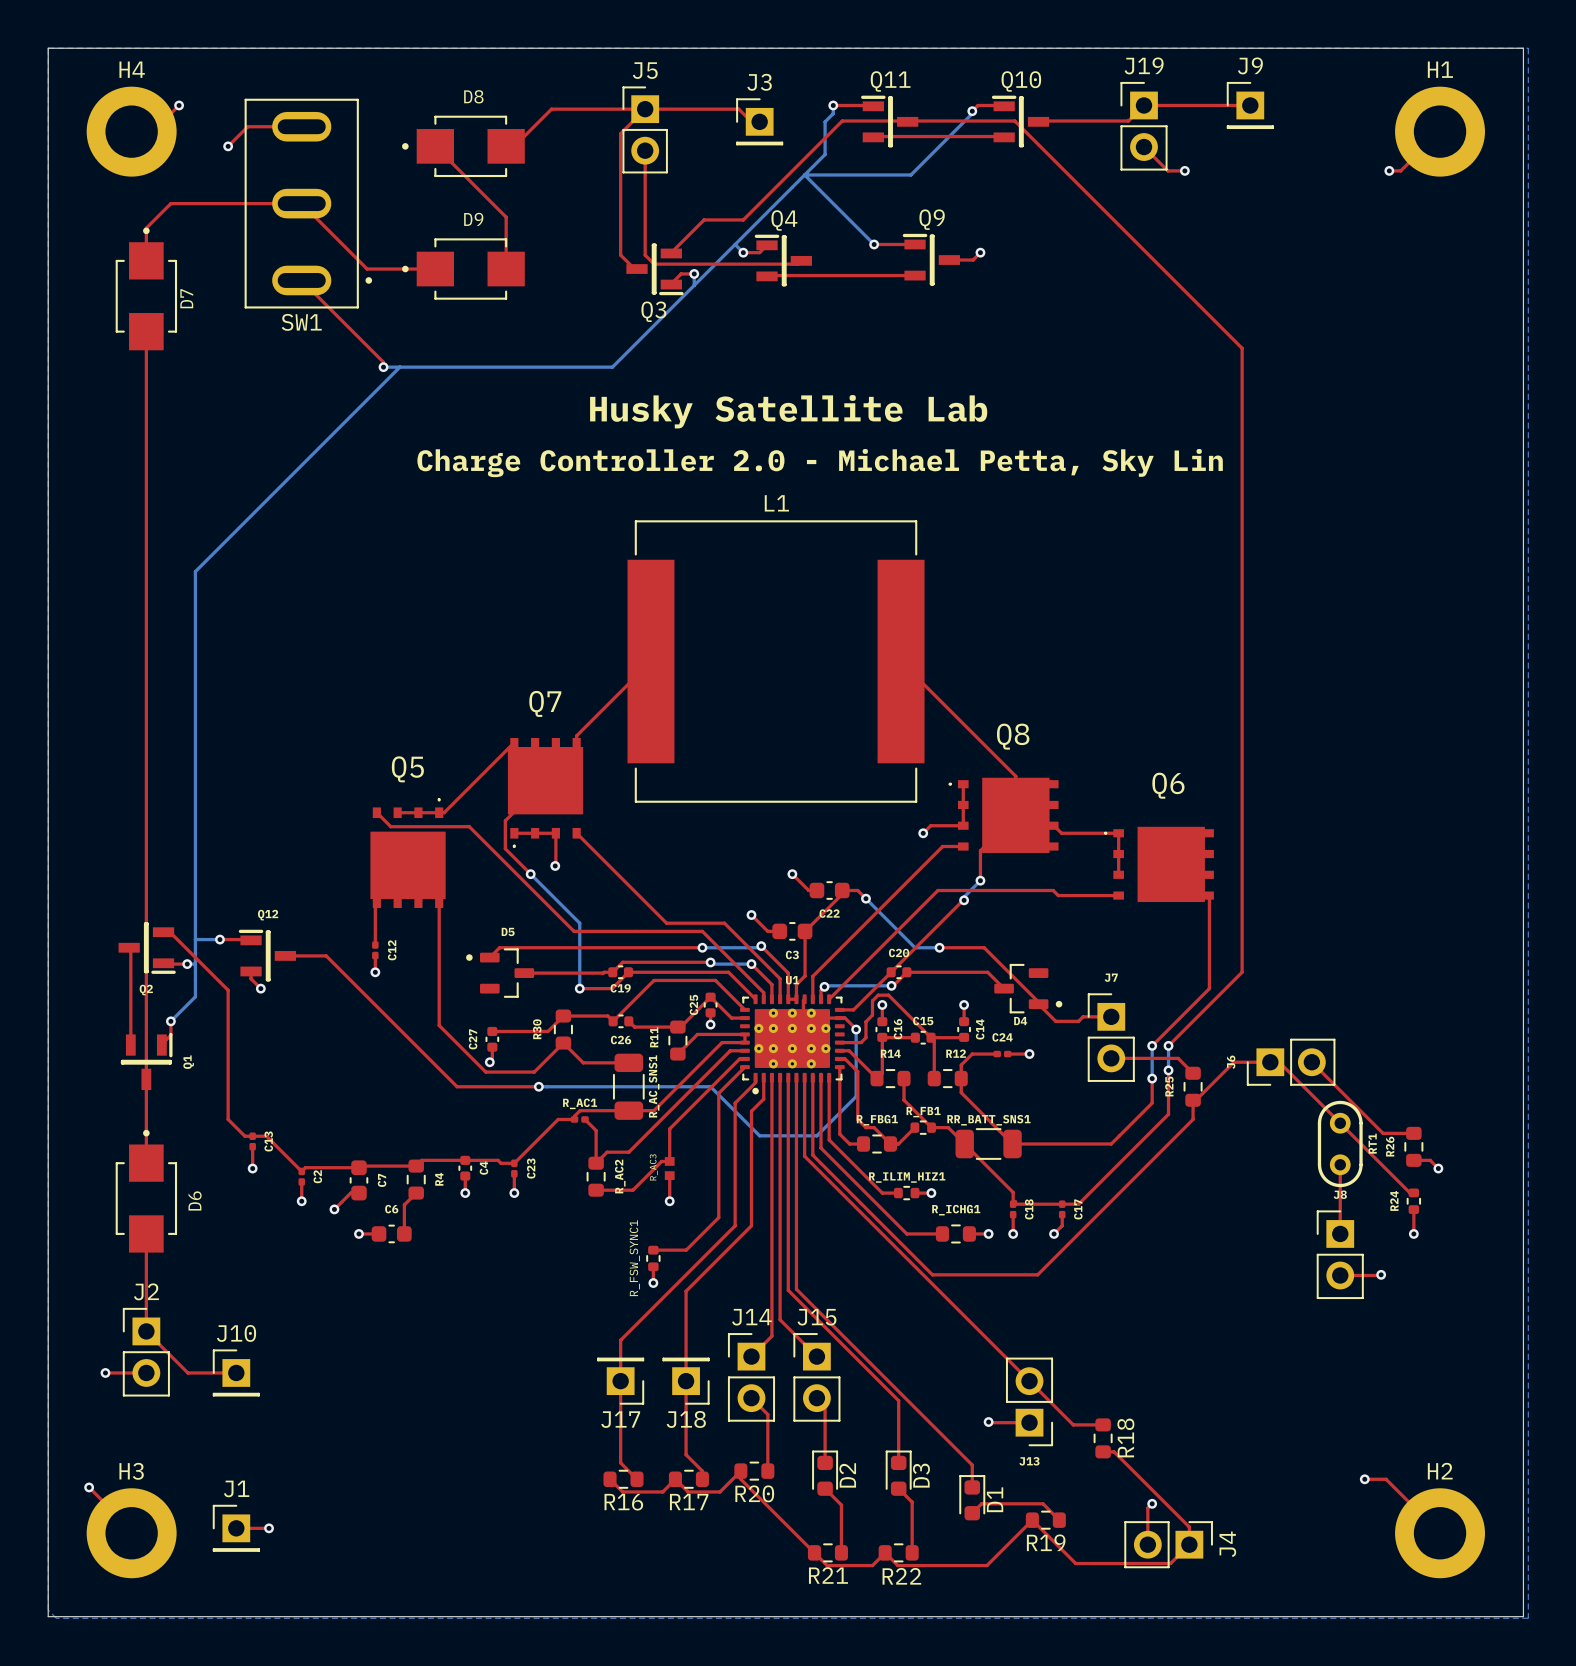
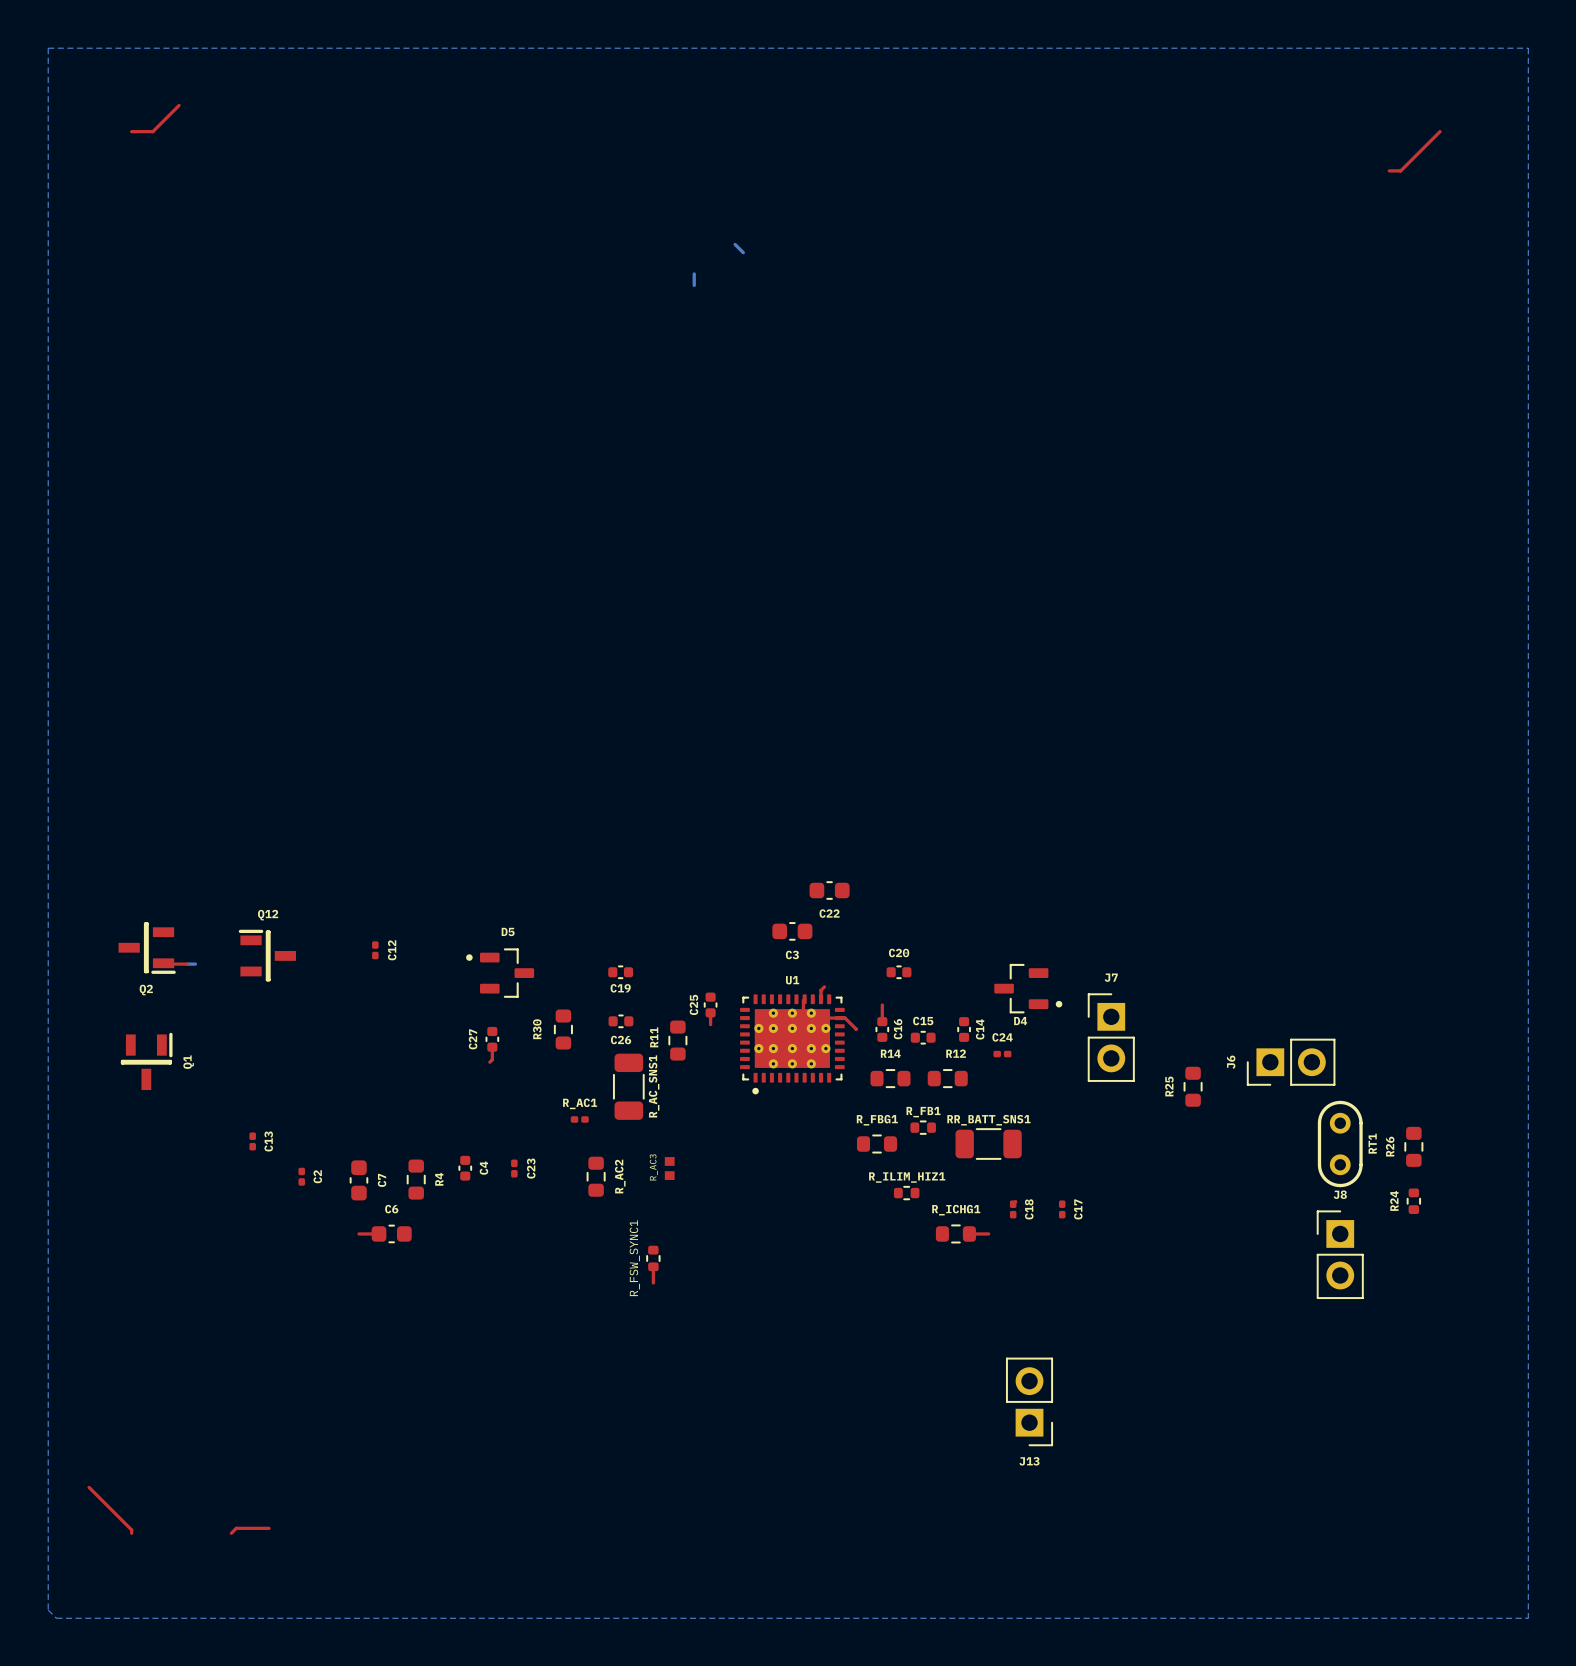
board edge: (48, 48) (48, 1616) (1523, 1616) (1523, 48) (48, 48) -> none
via: (179, 105) -> none
top track: (833, 105) (874, 105) -> none
bottom track: (833, 105) (833, 113) (825, 121) (825, 154) (612, 367) (383, 367) -> none
via: (833, 105) -> none
top track: (1004, 105) (978, 105) (972, 111) -> none
top track: (1250, 105) (1144, 105) (1128, 121) (1039, 121) -> none
J9: (1250, 105) -> none
top track: (645, 109) (620, 133) (620, 255) (635, 269) -> none
bottom track: (972, 111) (972, 113) (910, 174) (804, 174) (874, 244) -> none
via: (972, 111) -> none
top track: (759, 121) (751, 121) (738, 109) (551, 109) (514, 146) (506, 146) -> none
J3: (759, 121) -> none
Q11: (889, 121) -> none
Q10: (1020, 121) -> none
top track: (301, 126) (247, 126) (228, 146) -> none
J19: (1144, 126) -> none
J5: (645, 129) -> none
H4: (131, 131) -> none
H1: (1440, 131) -> none
top track: (874, 136) (1004, 136) -> none
via: (228, 146) -> none
top track: (435, 146) (506, 217) (506, 269) -> none
D8: (463, 146) -> none
top track: (1144, 147) (1167, 170) (1184, 170) -> none
top track: (645, 150) (645, 255) (654, 264) (798, 264) (802, 260) -> none
via: (1184, 170) -> none
via: (1389, 170) -> none
SW1: (308, 203) -> none
top track: (767, 244) (759, 252) (743, 252) -> none
top track: (874, 244) (906, 244) -> none
via: (874, 244) -> none
via: (743, 252) -> none
top track: (980, 252) (973, 260) (941, 260) -> none
via: (980, 252) -> none
top track: (669, 254) (704, 219) (743, 219) (842, 121) (1014, 121) (1242, 348) (1242, 972) (1168, 1045) -> none
Q9: (931, 259) -> none
top track: (146, 260) (146, 228) (170, 203) (301, 203) (367, 269) (435, 269) -> none
Q4: (783, 260) -> none
D9: (463, 269) -> none
Q3: (654, 269) -> none
top track: (694, 273) (681, 273) (669, 285) -> none
via: (694, 273) -> none
top track: (767, 275) (906, 275) -> none
top track: (301, 280) (383, 362) (383, 367) -> none
D7: (146, 288) -> none
top track: (146, 331) (146, 1163) -> none
via: (383, 367) -> none
bottom track: (399, 367) (195, 571) (195, 996) (170, 1021) -> none
text: Husky Satellite Lab (788, 411) -> none
text: Charge Controller 2.0 - Michael Petta, Sky Lin (820, 463) -> none
top track: (650, 661) (576, 735) (576, 742) -> none
L1: (776, 661) -> none
top track: (901, 672) (901, 661) (1015, 776) (1015, 815) (980, 850) (980, 880) -> none
top track: (514, 742) (444, 812) (397, 812) -> none
top track: (545, 780) (505, 820) (505, 848) (530, 874) -> none
top track: (963, 784) (963, 825) (930, 825) (923, 833) -> none
Q7: (545, 792) -> none
top track: (376, 812) (390, 826) (469, 826) (574, 931) (702, 931) (763, 992) (763, 999) -> none
Q8: (1003, 815) -> none
top track: (1054, 825) (1061, 833) (1118, 833) (1118, 874) -> none
top track: (514, 833) (555, 833) (555, 865) -> none
top track: (576, 833) (666, 923) (724, 923) (780, 978) (780, 999) -> none
via: (923, 833) -> none
top track: (963, 846) (942, 846) (812, 976) (812, 999) -> none
Q5: (408, 853) -> none
Q6: (1158, 864) -> none
via: (555, 865) -> none
bottom track: (530, 874) (579, 923) (579, 988) -> none
via: (530, 874) -> none
top track: (792, 874) (808, 890) (816, 890) -> none
via: (792, 874) -> none
bottom track: (980, 880) (964, 897) (964, 900) -> none
via: (980, 880) -> none
top track: (1118, 895) (1058, 895) (1053, 890) (937, 890) (829, 999) -> none
top track: (1209, 895) (1209, 988) (1152, 1045) -> none
top track: (865, 898) (857, 890) (842, 890) (842, 894) (805, 931) (805, 975) (796, 984) (796, 999) (788, 999) (788, 973) (761, 946) -> none
bottom track: (865, 898) (915, 947) (939, 947) -> none
via: (865, 898) -> none
top track: (964, 900) (853, 1009) (839, 1009) -> none
via: (964, 900) -> none
top track: (376, 903) (375, 945) -> none
top track: (439, 903) (439, 1025) (485, 1072) (534, 1072) (563, 1043) -> none
top track: (751, 915) (767, 931) (779, 931) -> none
via: (751, 915) -> none
top track: (164, 932) (170, 932) (228, 990) (228, 1119) (244, 1136) (266, 1136) (301, 1171) (305, 1167) (416, 1166) (411, 1161) -> none
bottom track: (195, 939) (219, 939) -> none
top track: (219, 939) (251, 940) -> none
via: (219, 939) -> none
bottom track: (761, 946) (759, 947) (702, 947) -> none
via: (761, 946) -> none
top track: (130, 947) (130, 1044) -> none
top track: (702, 947) (499, 947) (489, 957) -> none
via: (702, 947) -> none
top track: (939, 947) (984, 947) (1055, 1021) (1078, 1021) (1083, 1016) (1111, 1016) -> none
via: (939, 947) -> none
top track: (285, 955) (326, 955) (457, 1086) (538, 1086) -> none
top track: (375, 955) (375, 972) -> none
top track: (710, 962) (622, 962) (612, 972) (524, 973) -> none
bottom track: (710, 962) (712, 964) (751, 964) -> none
via: (710, 962) -> none
via: (187, 964) -> none
top track: (751, 964) (771, 984) (771, 999) -> none
via: (751, 964) -> none
top track: (251, 971) (251, 978) (260, 988) -> none
via: (375, 972) -> none
top track: (891, 985) (906, 972) (987, 972) (1004, 988) -> none
bottom track: (891, 985) (825, 985) (826, 988) -> none
via: (891, 985) -> none
via: (824, 986) -> none
via: (260, 988) -> none
top track: (579, 988) (612, 988) (628, 972) (728, 972) (755, 999) -> none
via: (579, 988) -> none
via: (882, 1004) -> none
top track: (964, 1004) (964, 1021) -> none
via: (964, 1004) -> none
top track: (744, 1009) (715, 980) (654, 980) (613, 1021) (607, 1016) (563, 1016) (547, 1031) (492, 1031) -> none
top track: (744, 1018) (731, 1018) (710, 997) (680, 1027) (634, 1027) (628, 1021) -> none
top track: (170, 1021) (170, 1035) (161, 1044) -> none
via: (170, 1021) -> none
via: (710, 1024) -> none
bottom track: (856, 1029) (856, 1096) (816, 1135) (759, 1135) (710, 1086) (538, 1086) -> none
via: (856, 1029) -> none
top track: (915, 1037) (882, 1037) (882, 1073) (877, 1078) (849, 1050) (839, 1050) -> none
top track: (964, 1037) (931, 1037) -> none
top track: (839, 1042) (861, 1042) (865, 1037) (865, 1021) (872, 1015) (872, 1000) (878, 995) (888, 995) (934, 1040) (934, 1078) -> none
top track: (563, 1043) (583, 1062) (628, 1062) -> none
bottom track: (1152, 1045) (1152, 1078) -> none
via: (1152, 1045) -> none
bottom track: (1168, 1045) (1168, 1070) -> none
via: (1168, 1045) -> none
top track: (744, 1050) (730, 1050) (628, 1152) (607, 1152) (596, 1163) (596, 1130) (585, 1119) -> none
top track: (677, 1054) (697, 1034) (744, 1034) (744, 1042) (722, 1042) (653, 1110) (580, 1110) (574, 1116) (574, 1119) (558, 1119) (514, 1163) (500, 1163) (497, 1160) (421, 1160) (414, 1167) -> none
top track: (997, 1054) (972, 1054) (961, 1065) (961, 1092) (1012, 1144) (1111, 1144) (1152, 1103) (1152, 1078) -> none
top track: (1007, 1054) (1029, 1054) -> none
via: (1029, 1054) -> none
top track: (744, 1058) (739, 1058) (669, 1128) (669, 1161) (661, 1161) (632, 1190) (596, 1190) -> none
top track: (839, 1058) (845, 1058) (857, 1071) (857, 1119) (865, 1127) (874, 1127) (890, 1144) (898, 1144) (914, 1127) -> none
top track: (1111, 1058) (1178, 1058) (1193, 1073) -> none
via: (489, 1062) -> none
top track: (1311, 1062) (1383, 1133) (1413, 1133) -> none
top track: (744, 1067) (718, 1093) (718, 1217) (686, 1250) (653, 1250) -> none
top track: (839, 1067) (839, 1134) (849, 1144) (863, 1144) -> none
top track: (1168, 1070) (1168, 1114) (1078, 1204) (1013, 1204) (1013, 1192) (948, 1127) (931, 1127) (904, 1100) (904, 1078) -> none
via: (1168, 1070) -> none
top track: (755, 1077) (755, 1082) (735, 1103) (735, 1225) (620, 1340) (620, 1462) (637, 1479) -> none
top track: (763, 1077) (763, 1099) (751, 1111) (751, 1225) (686, 1291) (686, 1454) (702, 1471) (702, 1479) -> none
top track: (771, 1077) (771, 1336) (751, 1356) -> none
top track: (780, 1077) (780, 1319) (816, 1356) -> none
top track: (788, 1077) (788, 1290) (898, 1400) (898, 1462) -> none
top track: (796, 1077) (796, 1289) (972, 1465) (972, 1487) -> none
top track: (804, 1077) (804, 1156) (1073, 1424) (1103, 1424) -> none
top track: (812, 1077) (812, 1155) (932, 1274) (1037, 1274) (1193, 1119) (1193, 1100) (1195, 1100) (1233, 1062) (1279, 1062) (1409, 1192) (1413, 1192) -> none
top track: (820, 1077) (820, 1148) (906, 1233) (942, 1233) -> none
top track: (829, 1077) (829, 1139) (882, 1193) (898, 1193) -> none
via: (1152, 1078) -> none
via: (538, 1086) -> none
top track: (252, 1146) (252, 1168) -> none
top track: (1413, 1160) (1430, 1160) (1438, 1168) -> none
top track: (1340, 1164) (1340, 1233) -> none
via: (252, 1168) -> none
via: (1438, 1168) -> none
top track: (514, 1173) (514, 1193) -> none
top track: (669, 1175) (669, 1201) -> none
top track: (465, 1176) (465, 1193) -> none
top track: (301, 1181) (301, 1201) -> none
D6: (146, 1191) -> none
top track: (358, 1193) (350, 1193) (334, 1209) -> none
top track: (416, 1193) (404, 1204) (404, 1233) -> none
via: (465, 1193) -> none
via: (514, 1193) -> none
top track: (915, 1193) (931, 1193) -> none
via: (931, 1193) -> none
via: (301, 1201) -> none
via: (669, 1201) -> none
via: (334, 1209) -> none
top track: (1413, 1209) (1413, 1233) -> none
top track: (1013, 1214) (1013, 1233) -> none
top track: (1062, 1214) (1062, 1225) (1054, 1233) -> none
top track: (146, 1233) (146, 1331) (187, 1372) (236, 1372) -> none
via: (358, 1233) -> none
via: (988, 1233) -> none
via: (1013, 1233) -> none
via: (1054, 1233) -> none
via: (1413, 1233) -> none
top track: (1381, 1274) (1340, 1275) -> none
via: (1381, 1274) -> none
via: (653, 1283) -> none
J2: (146, 1352) -> none
top track: (105, 1372) (146, 1372) -> none
via: (105, 1372) -> none
J10: (236, 1372) -> none
J14: (751, 1377) -> none
J15: (816, 1377) -> none
J17: (620, 1381) -> none
J18: (686, 1381) -> none
top track: (751, 1398) (767, 1414) (767, 1471) -> none
top track: (816, 1398) (825, 1406) (825, 1462) -> none
top track: (988, 1422) (1029, 1422) (1029, 1426) -> none
via: (988, 1422) -> none
R18: (1103, 1438) -> none
top track: (1103, 1451) (1114, 1451) (1189, 1527) (1189, 1544) (1170, 1563) (1075, 1563) (1032, 1520) (986, 1565) (897, 1565) (885, 1552) (872, 1565) (827, 1565) (740, 1479) (740, 1471) (719, 1491) (688, 1491) (675, 1479) (662, 1491) (622, 1491) (610, 1479) -> none
R20: (754, 1471) -> none
D2: (825, 1473) -> none
D3: (898, 1473) -> none
R16: (623, 1479) -> none
R17: (688, 1479) -> none
top track: (1364, 1479) (1386, 1479) (1440, 1533) -> none
via: (1364, 1479) -> none
via: (89, 1487) -> none
top track: (825, 1488) (841, 1505) (841, 1552) -> none
top track: (898, 1488) (912, 1502) (912, 1552) -> none
D1: (972, 1497) -> none
top track: (1152, 1503) (1147, 1508) (1147, 1544) -> none
via: (1152, 1503) -> none
top track: (972, 1513) (981, 1503) (1043, 1503) (1059, 1520) -> none
R19: (1045, 1520) -> none
J1: (236, 1528) -> none
via: (269, 1528) -> none
H3: (131, 1533) -> none
H2: (1440, 1533) -> none
J4: (1168, 1544) -> none
R21: (827, 1552) -> none
R22: (898, 1552) -> none

